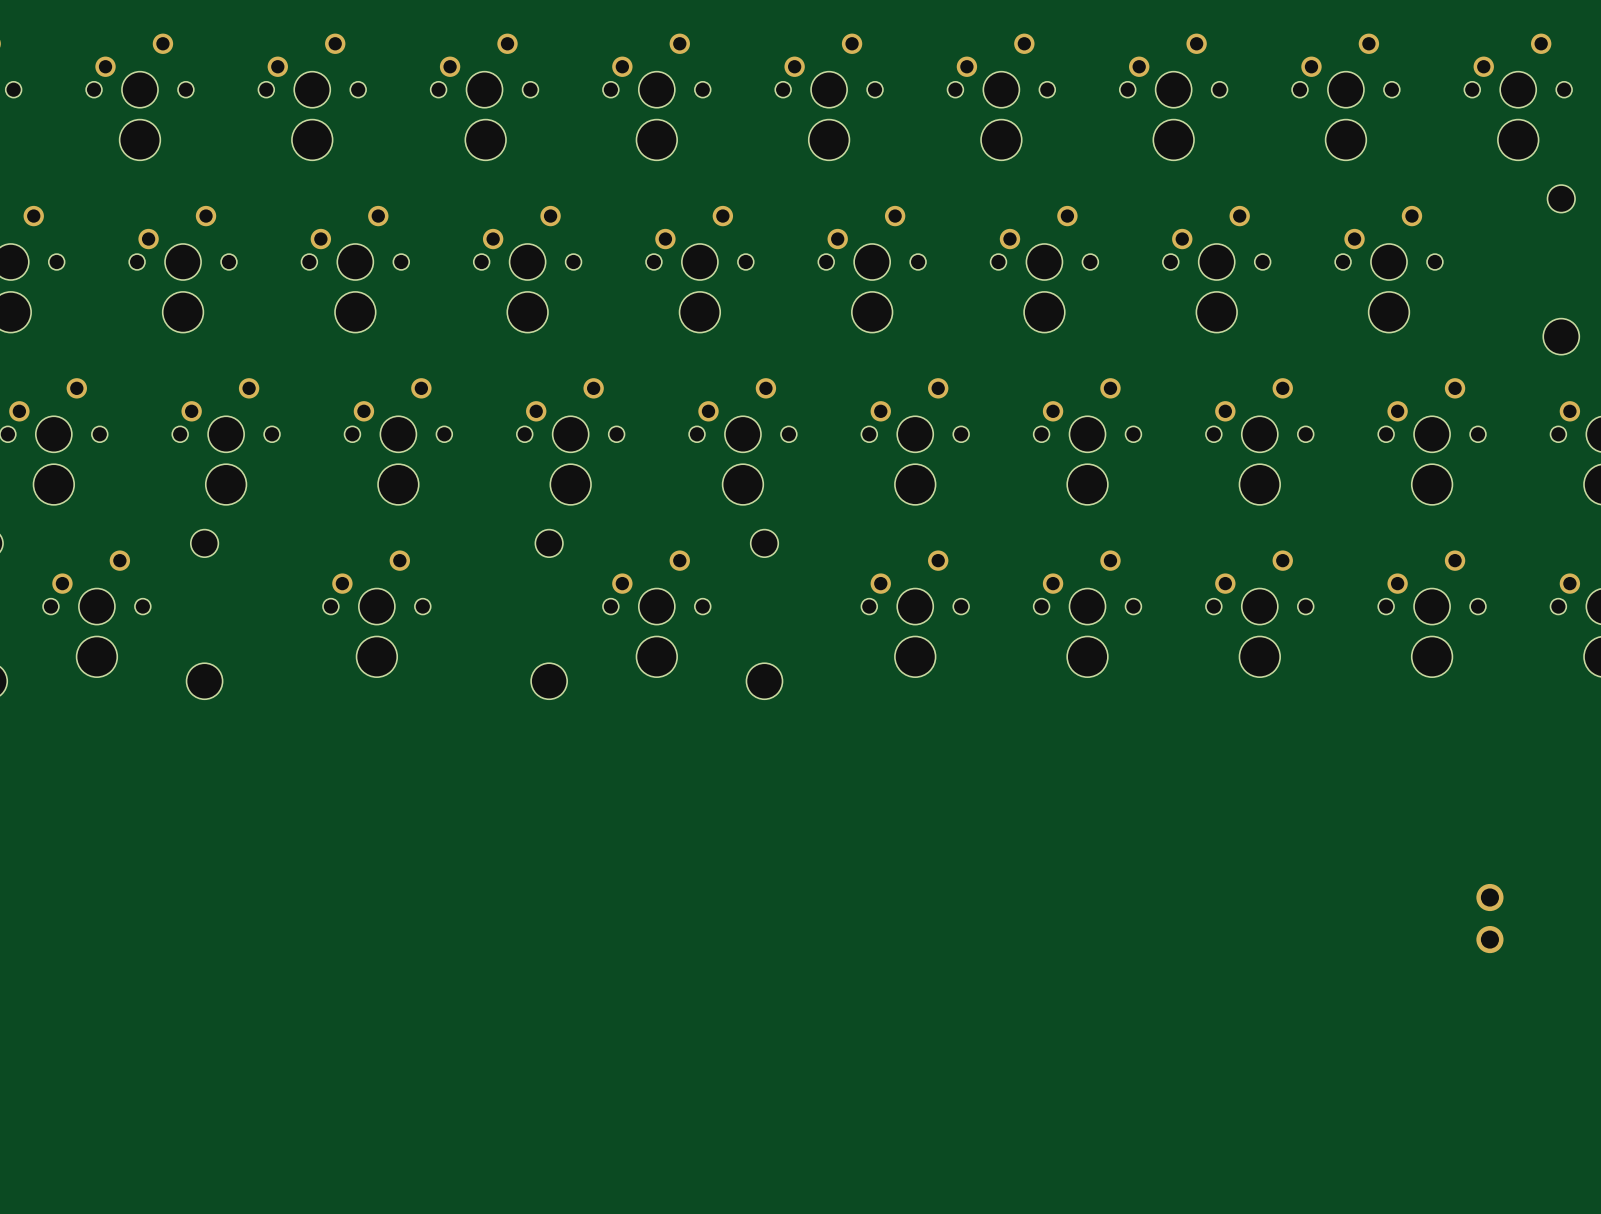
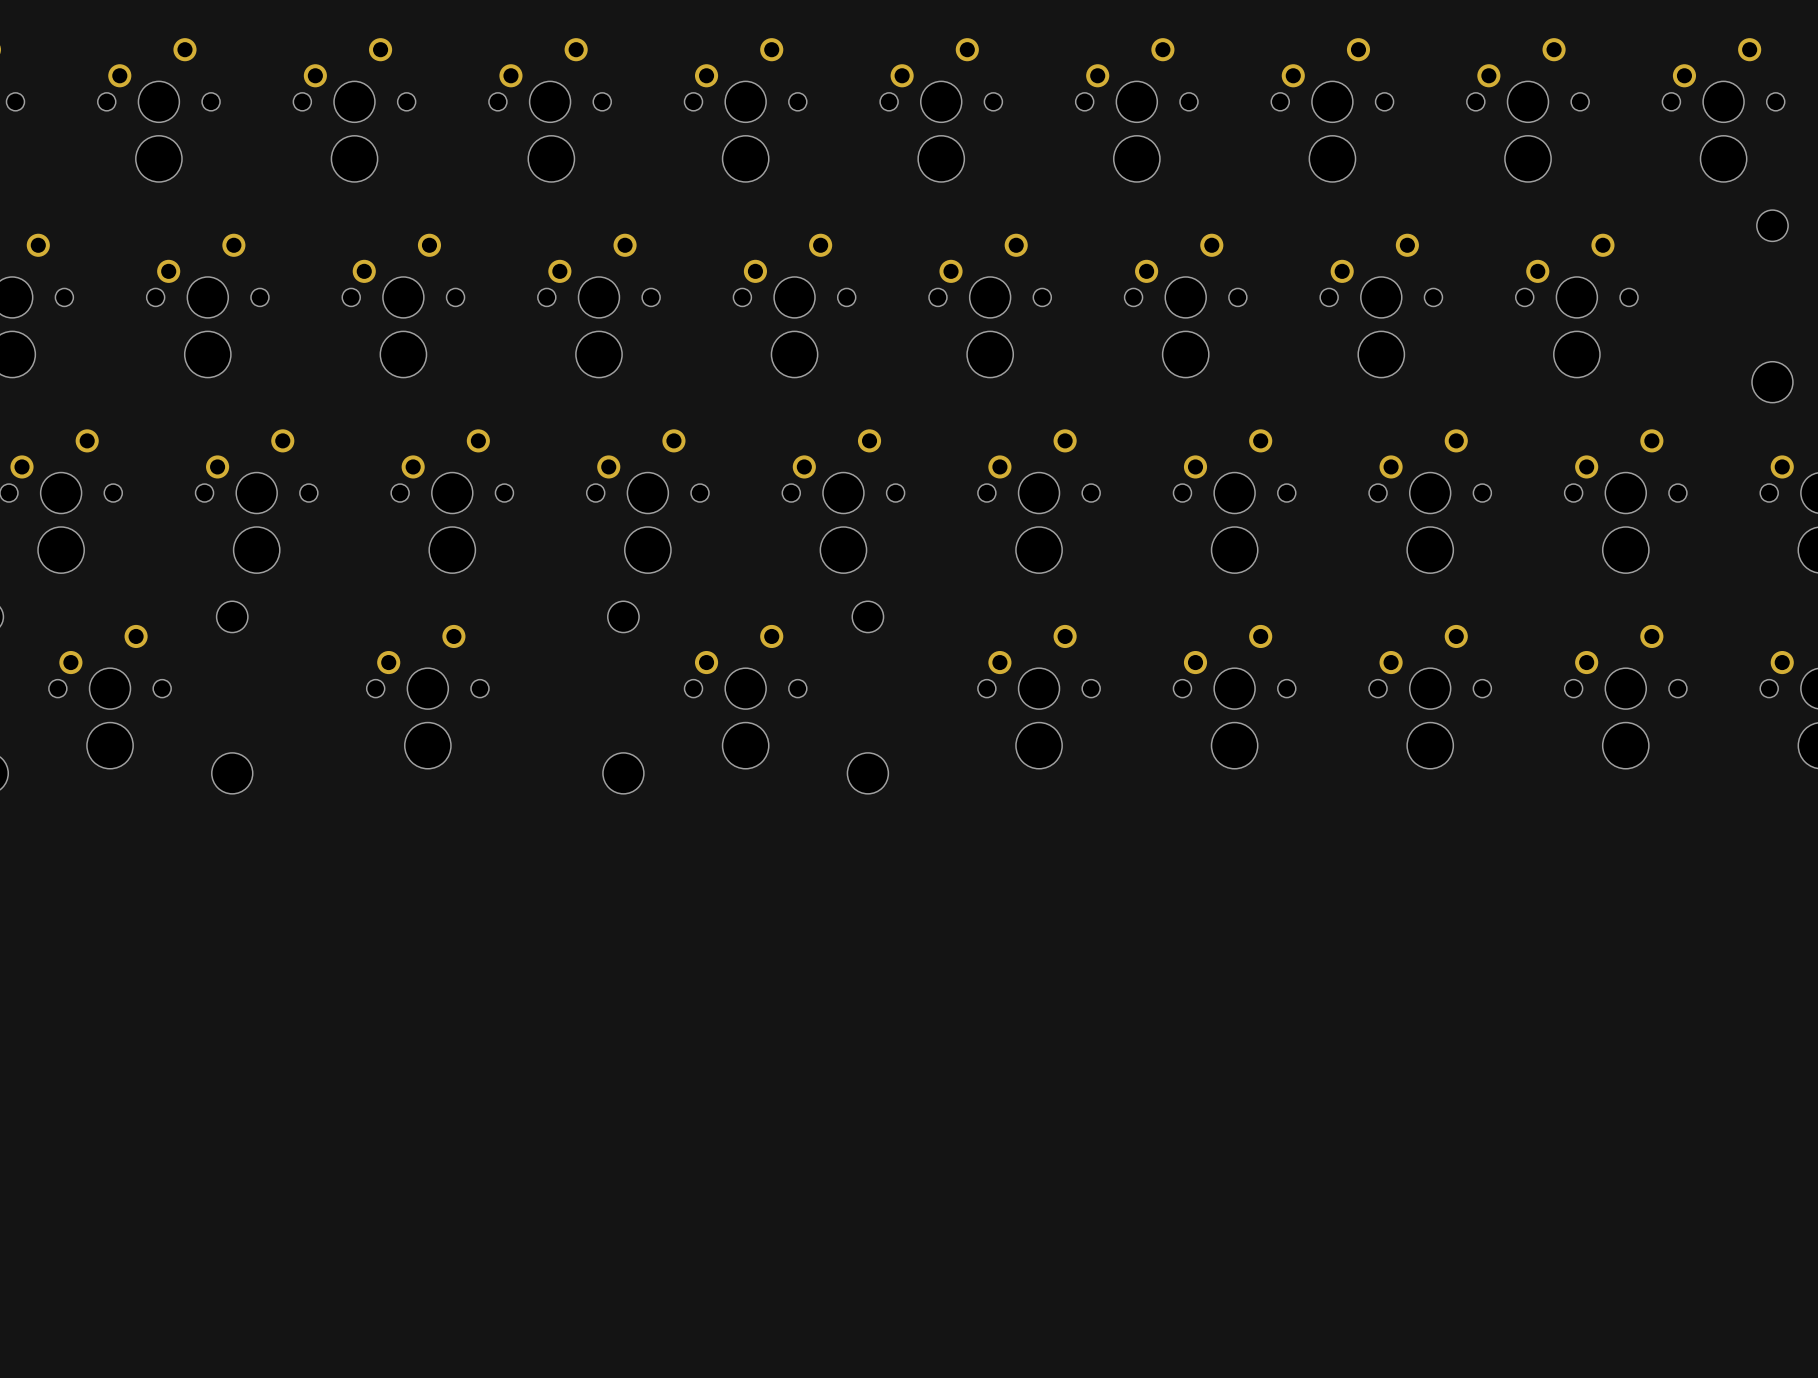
part: (1489, 897) -> none
part: (1489, 939) -> none

